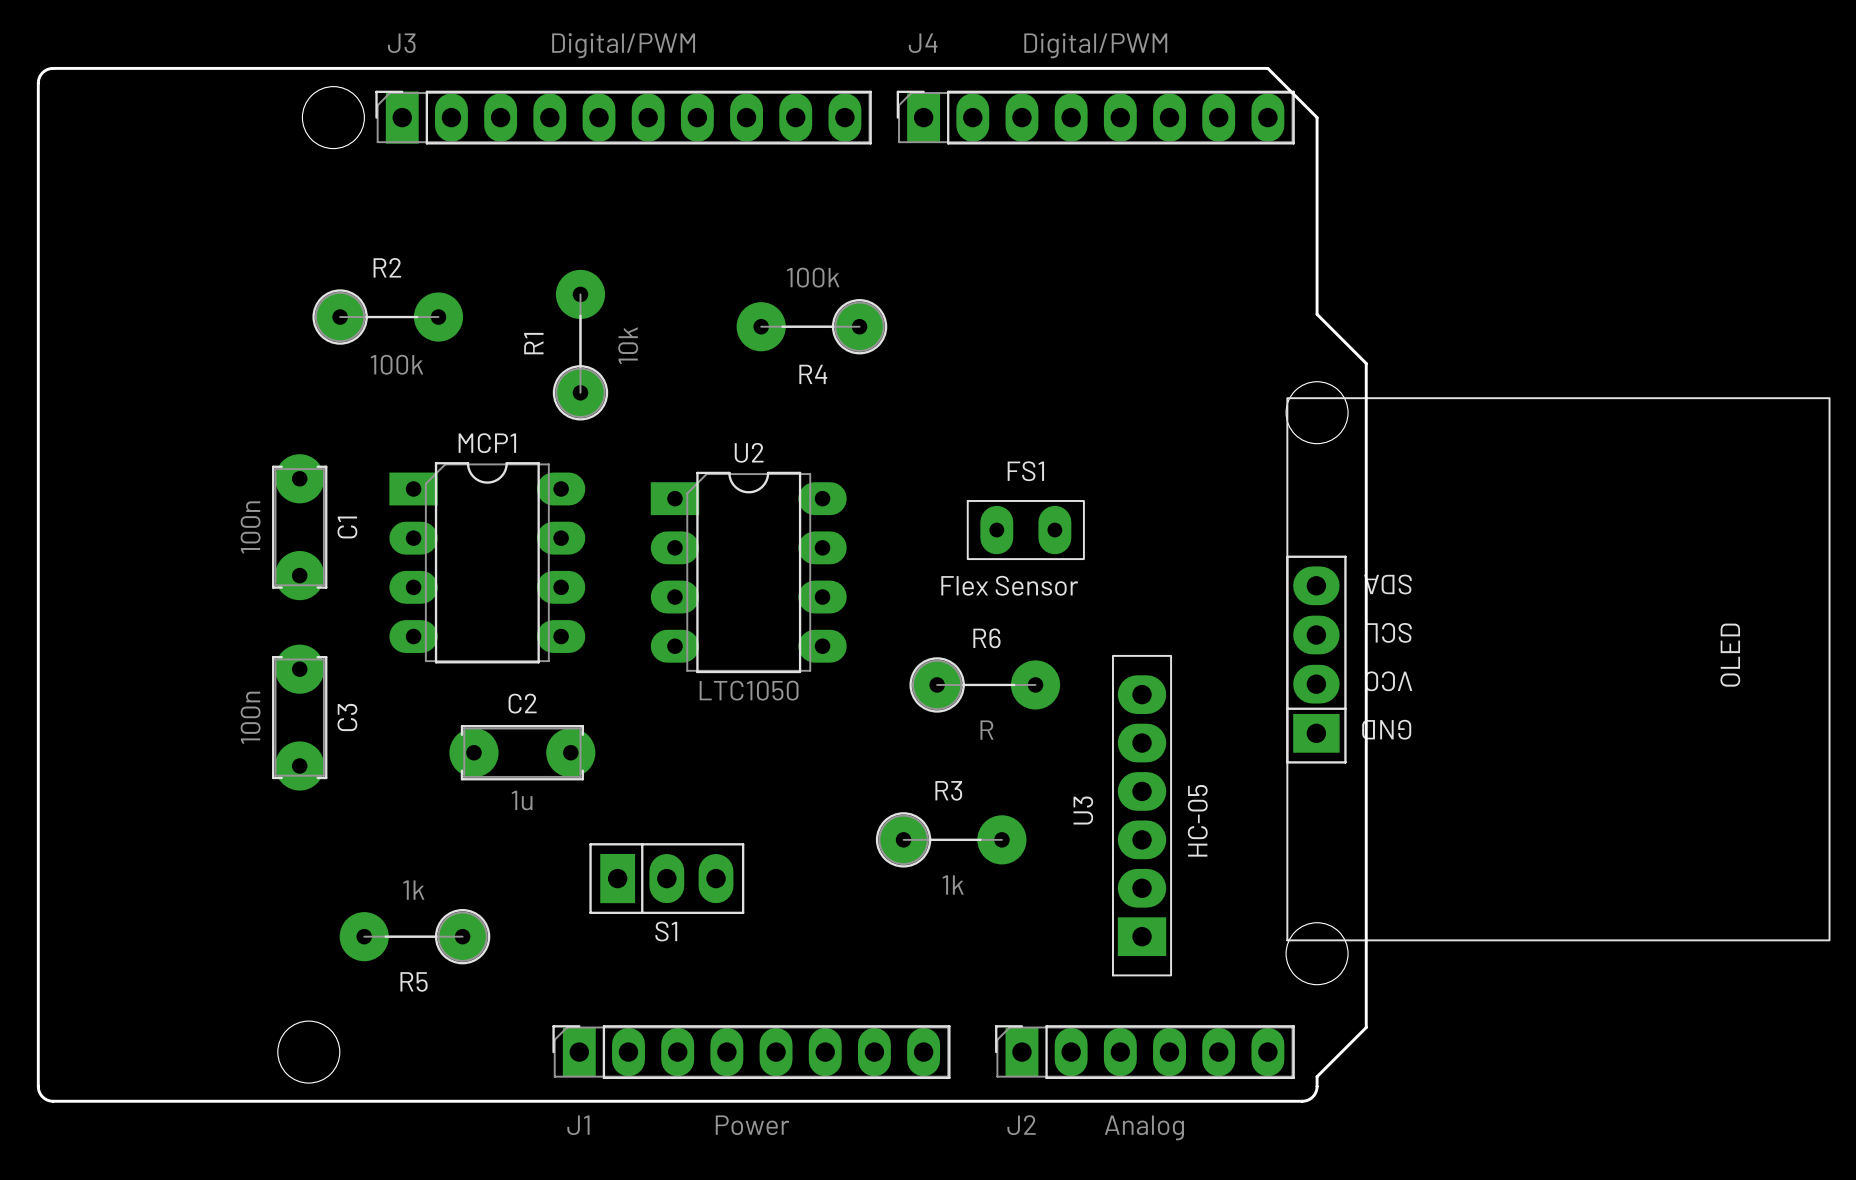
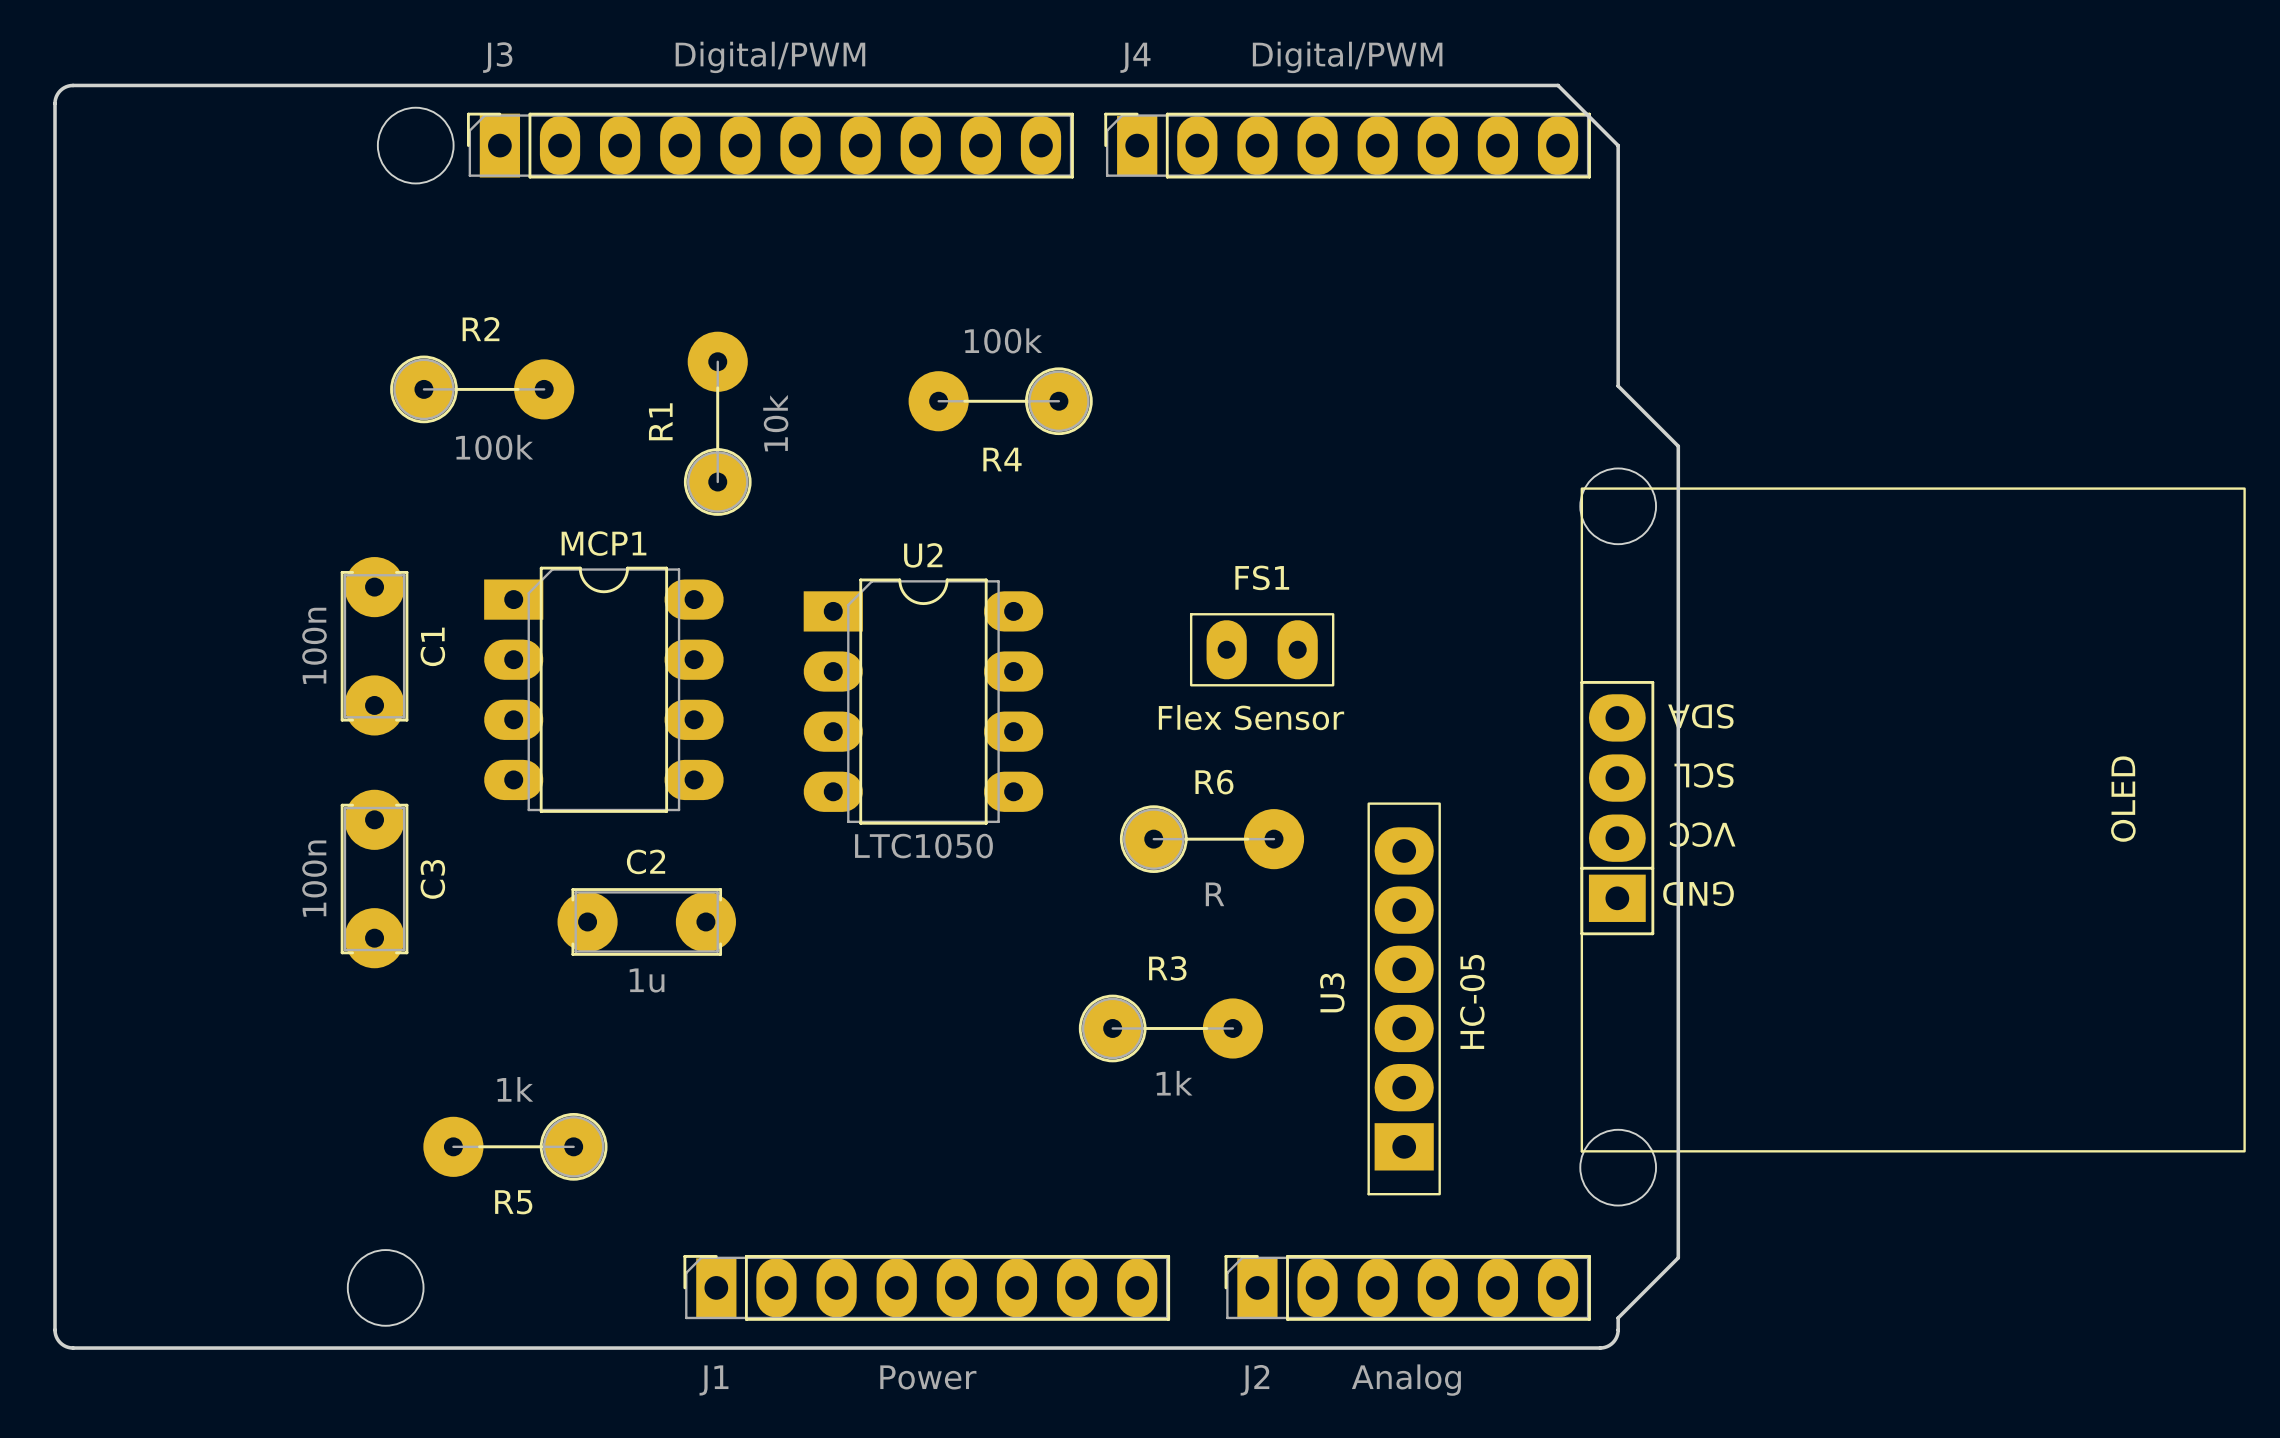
S1: (666, 878) -> none

